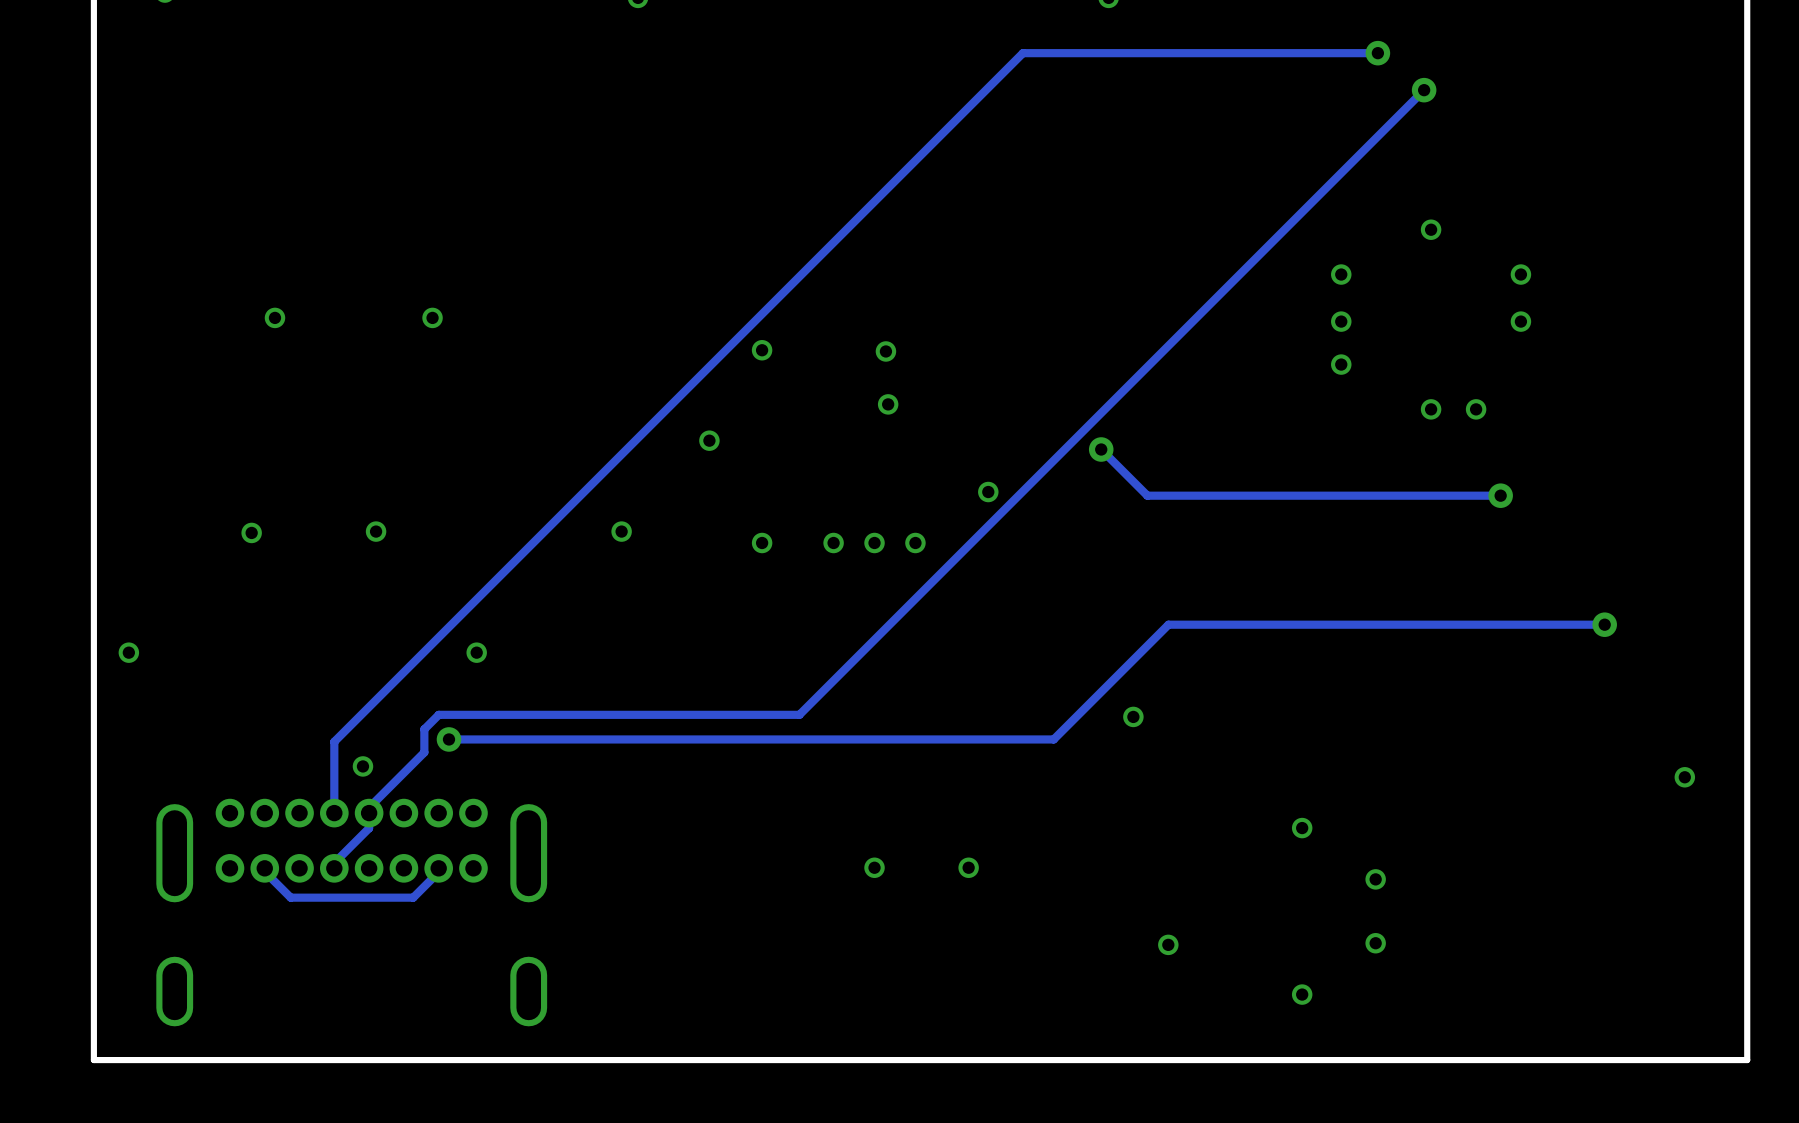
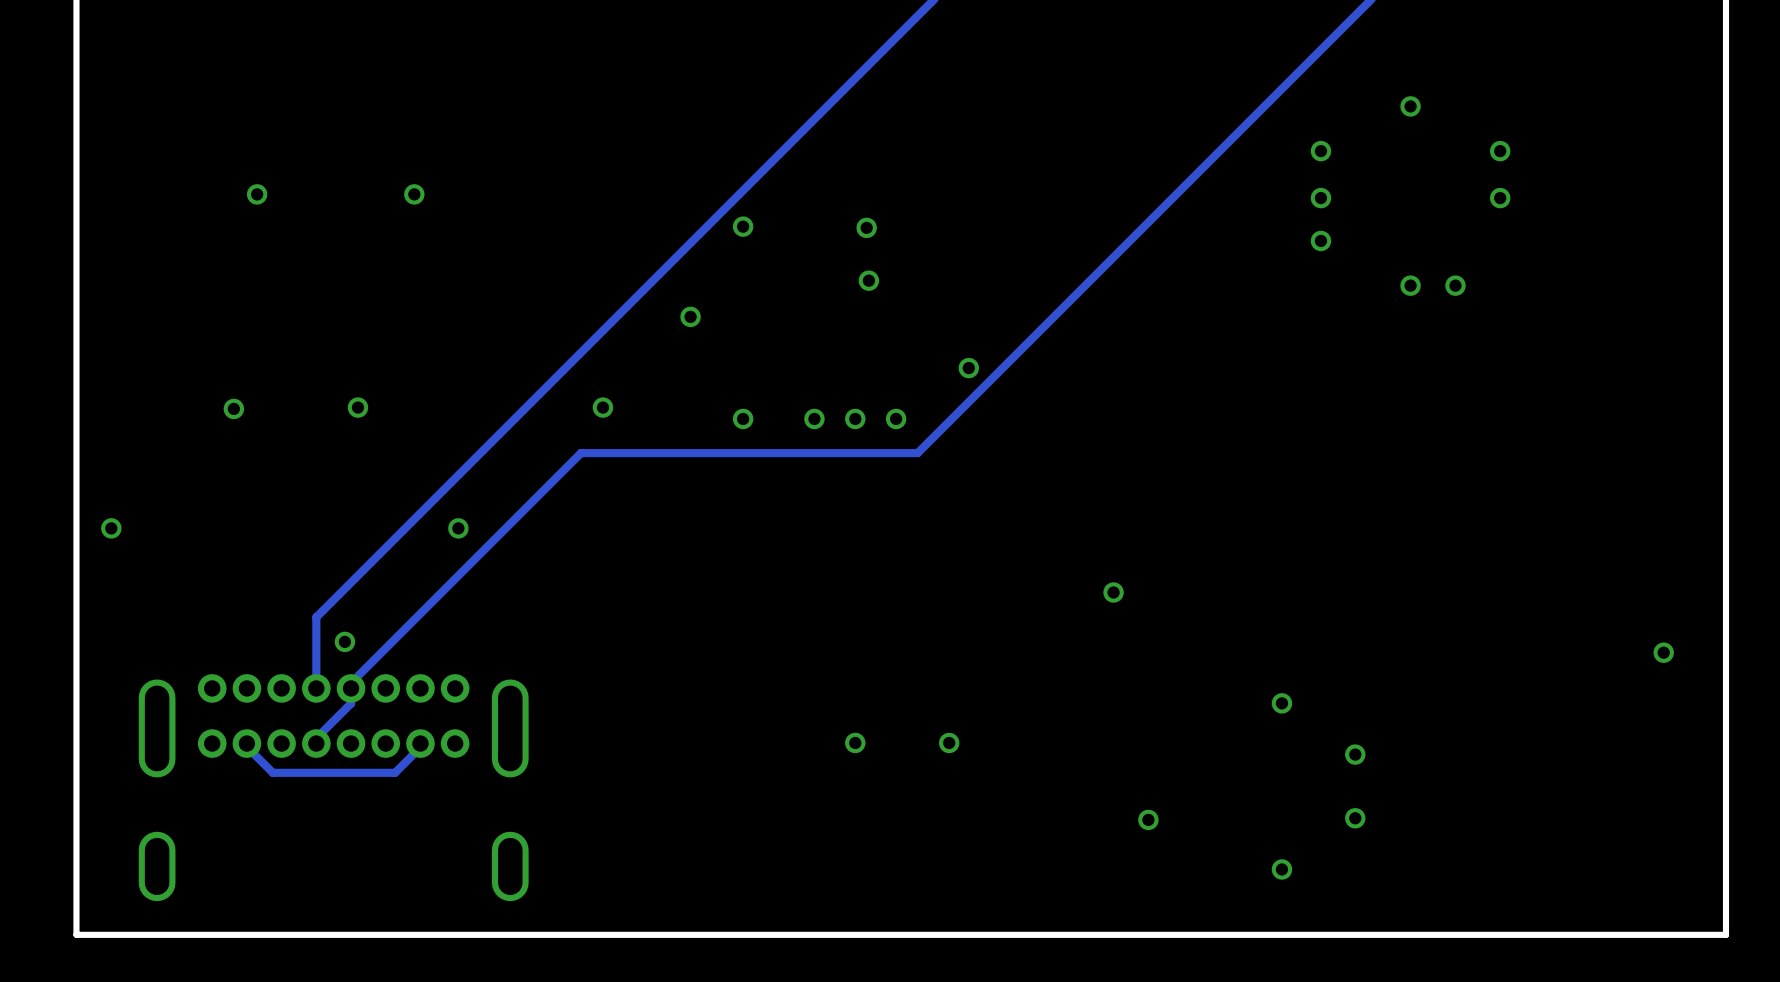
track: (1101, 449) (1147, 495) (1500, 495) -> none
via: (1101, 449) -> none
via: (1500, 495) -> none
track: (937, 577) (799, 714) (438, 714) (424, 729) (424, 752) -> (917, 453) (580, 453) (406, 627)
track: (1604, 624) (1168, 624) (1053, 739) (448, 739) -> none
via: (1604, 624) -> none
via: (448, 739) -> none

